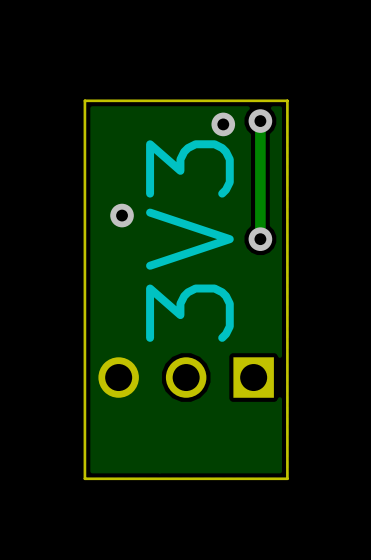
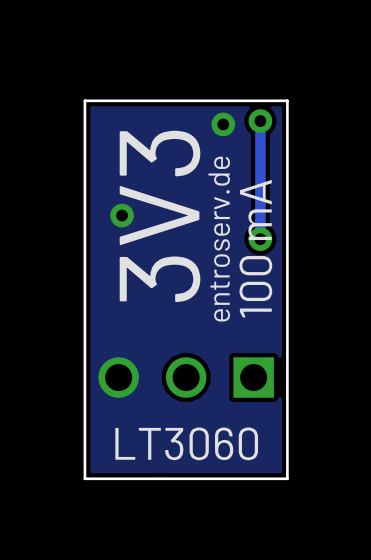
text: none -> entroserv.de (219, 239)
text position: 3V3 (189, 241) -> 3V3 (160, 216)
text: none -> 100 mA (255, 248)
text: none -> LT3060 (186, 443)

